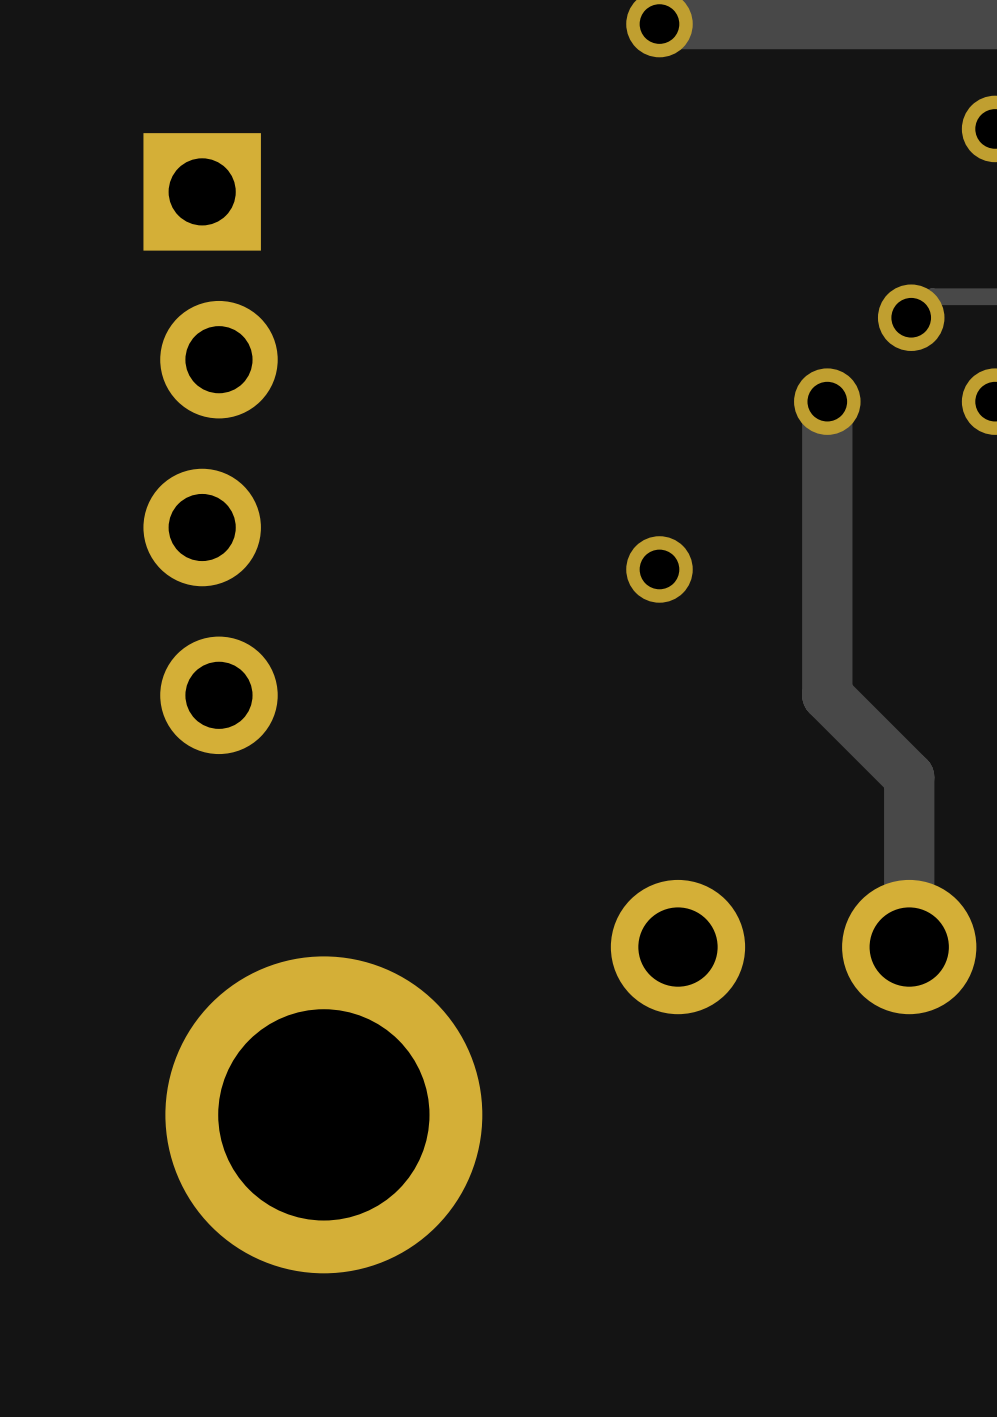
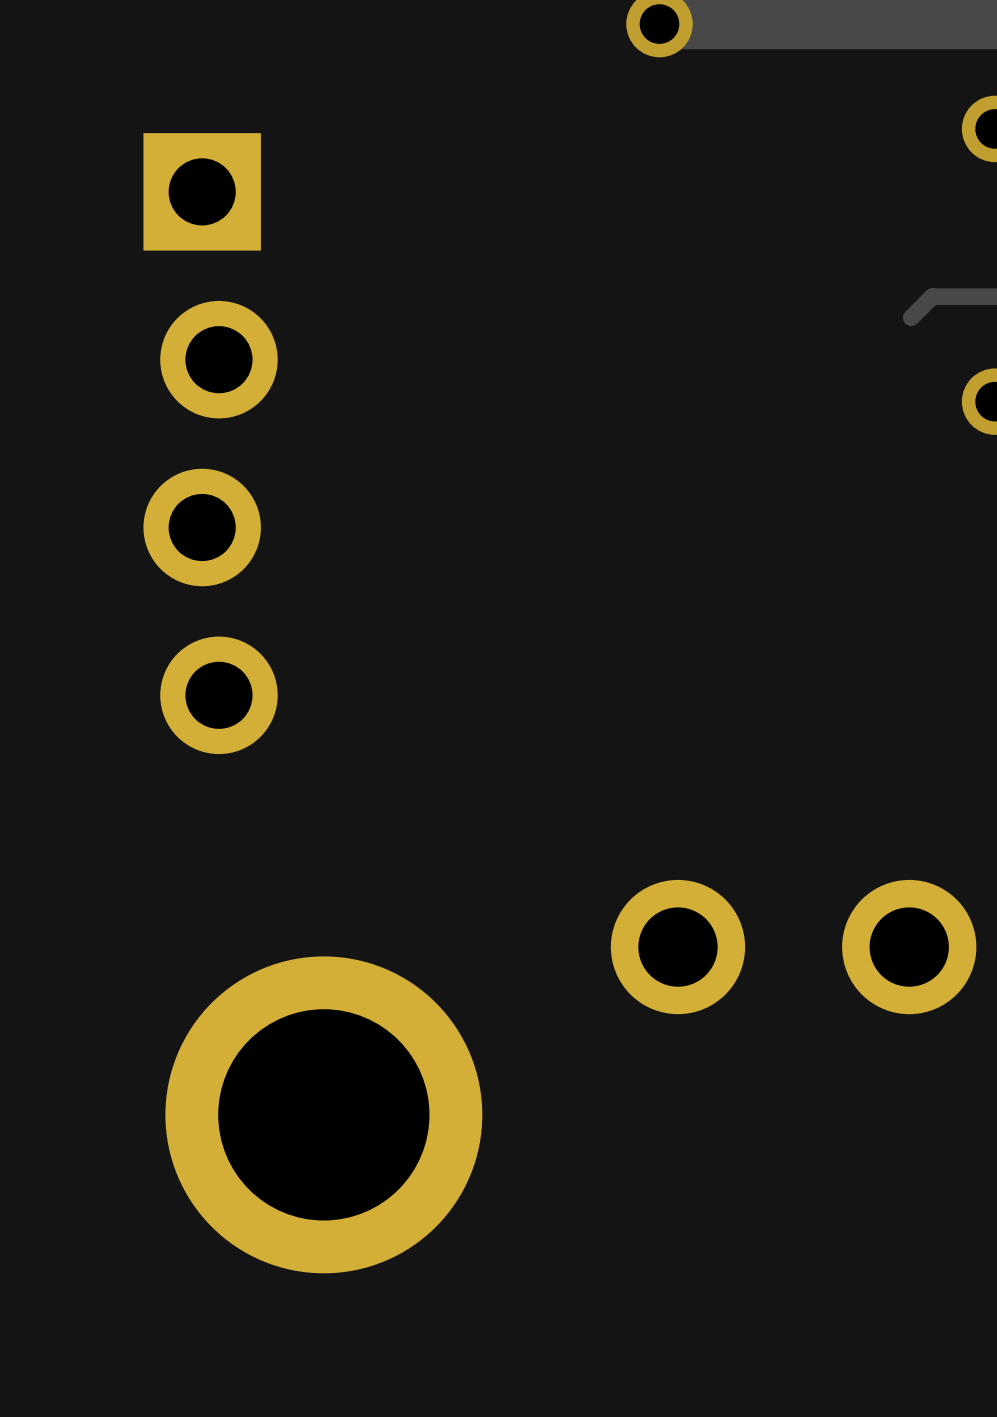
via: (911, 317) -> none
track: (827, 401) (827, 695) (909, 777) (909, 947) -> none
via: (827, 401) -> none
via: (659, 569) -> none

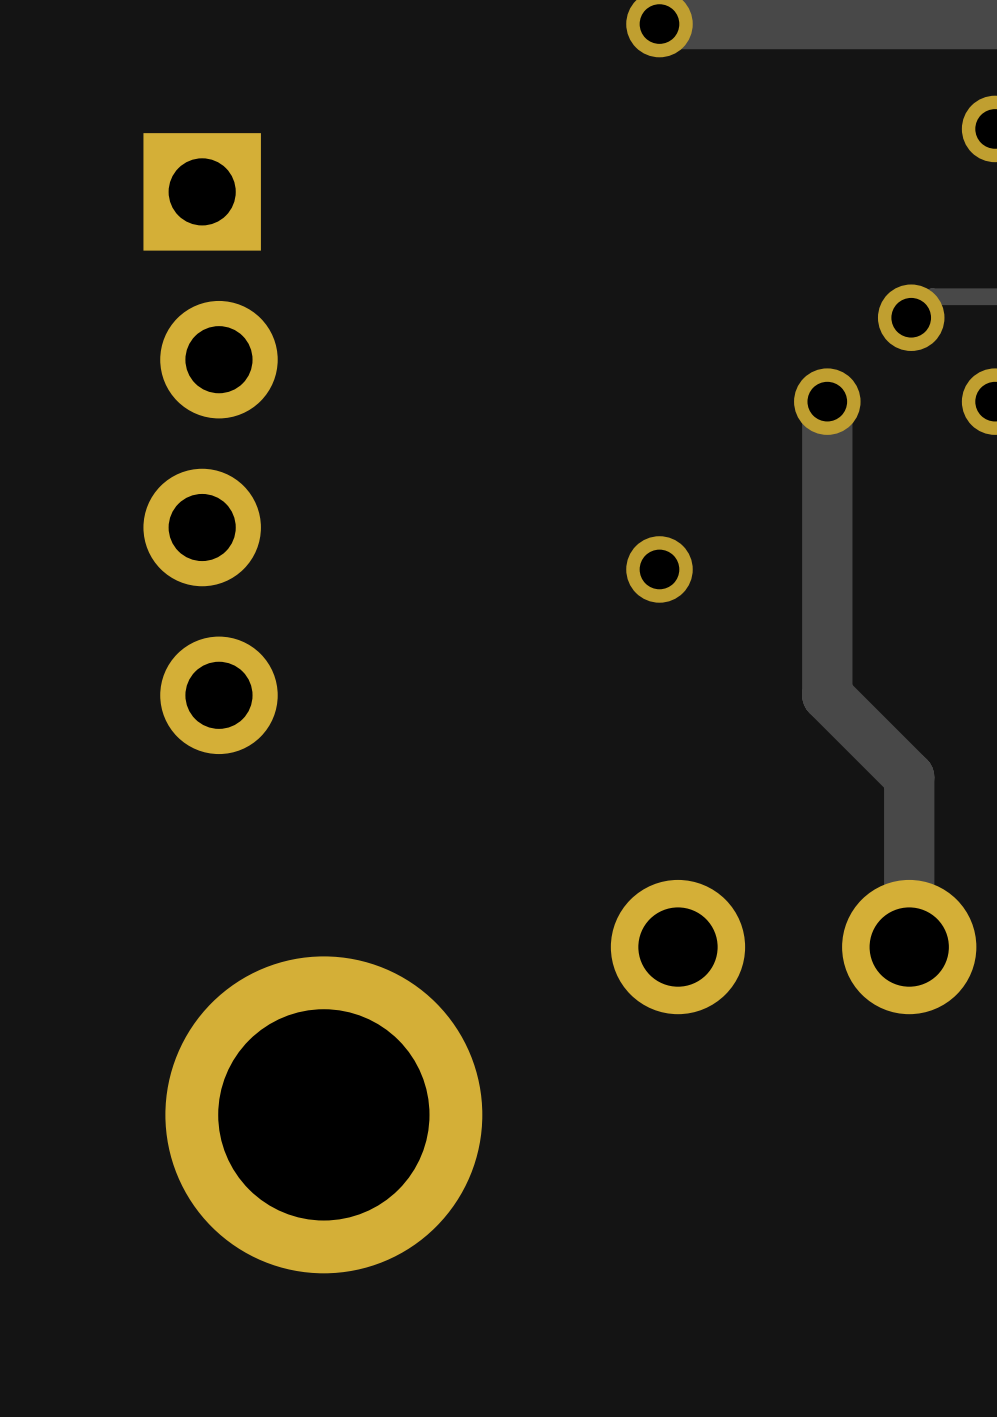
via: none -> (911, 317)
track: none -> (827, 401) (827, 695) (909, 777) (909, 947)
via: none -> (827, 401)
via: none -> (659, 569)

